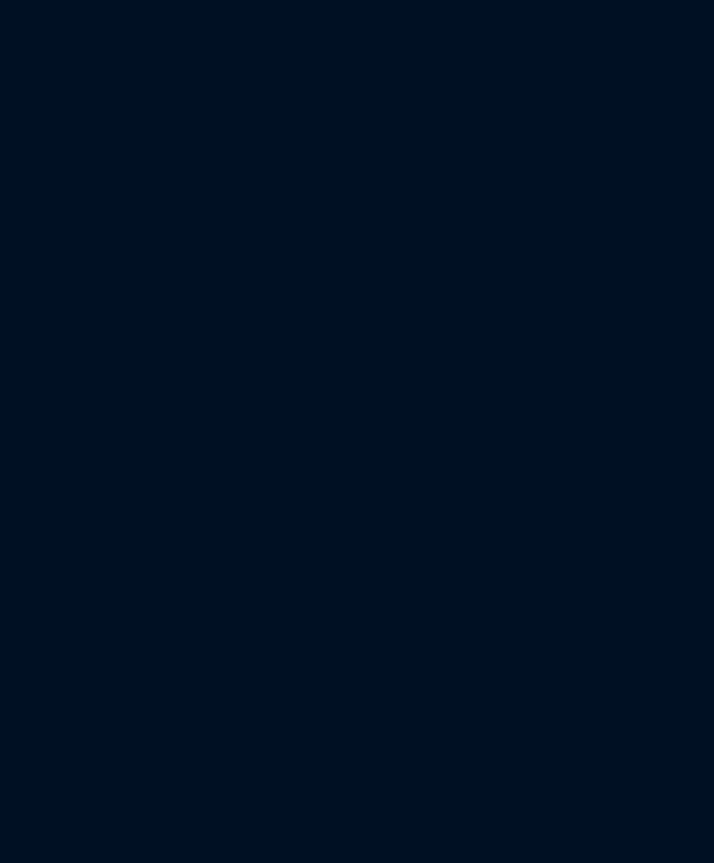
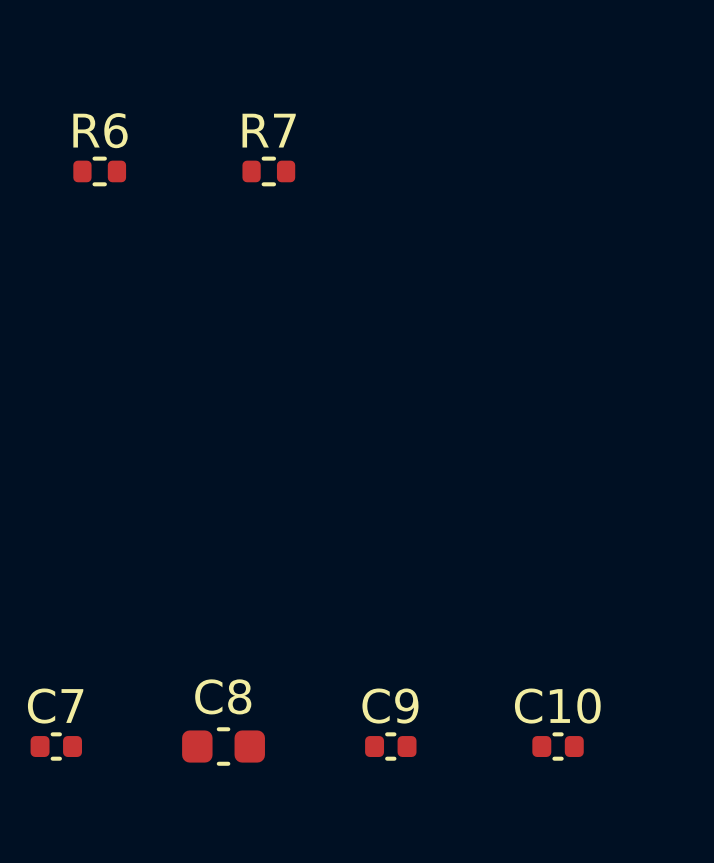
R6: none -> (99, 171)
R7: none -> (268, 171)
C7: none -> (56, 746)
C8: none -> (223, 746)
C9: none -> (390, 746)
C10: none -> (558, 746)

